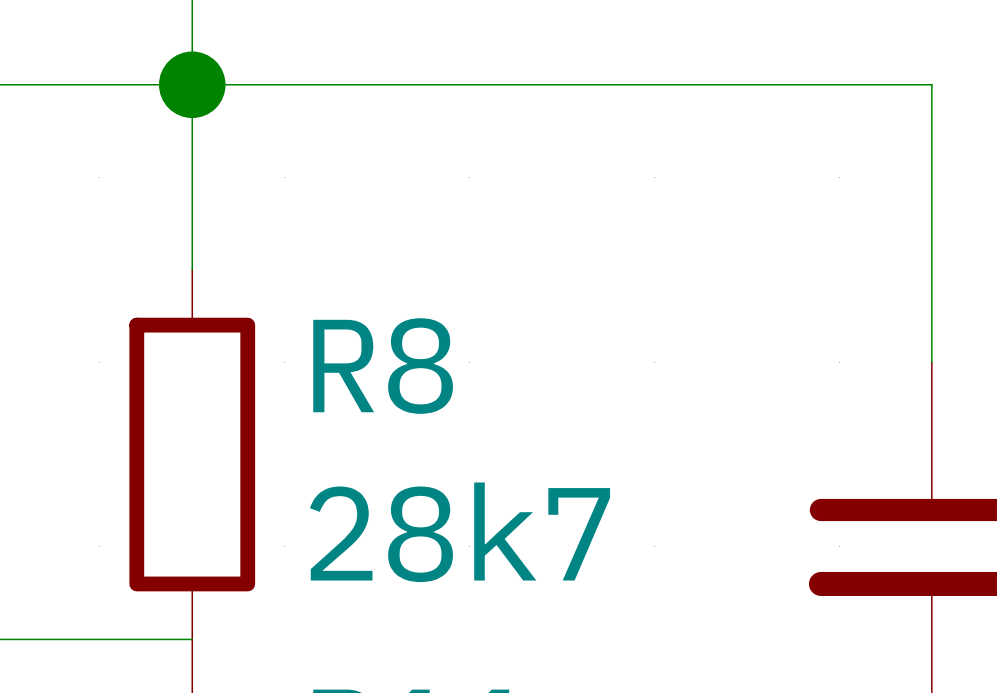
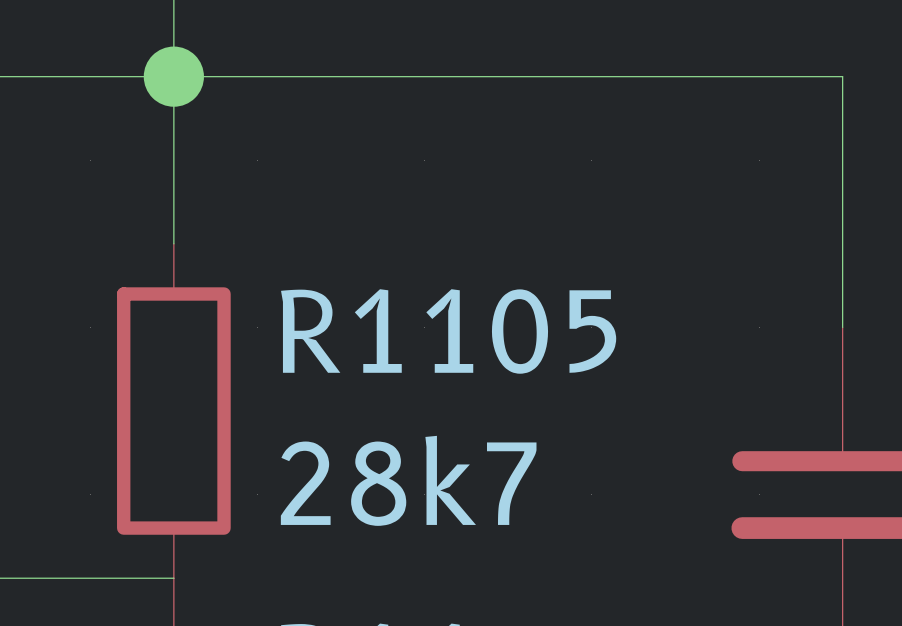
R8 name: R8 (383, 366) -> R1105 (448, 331)

